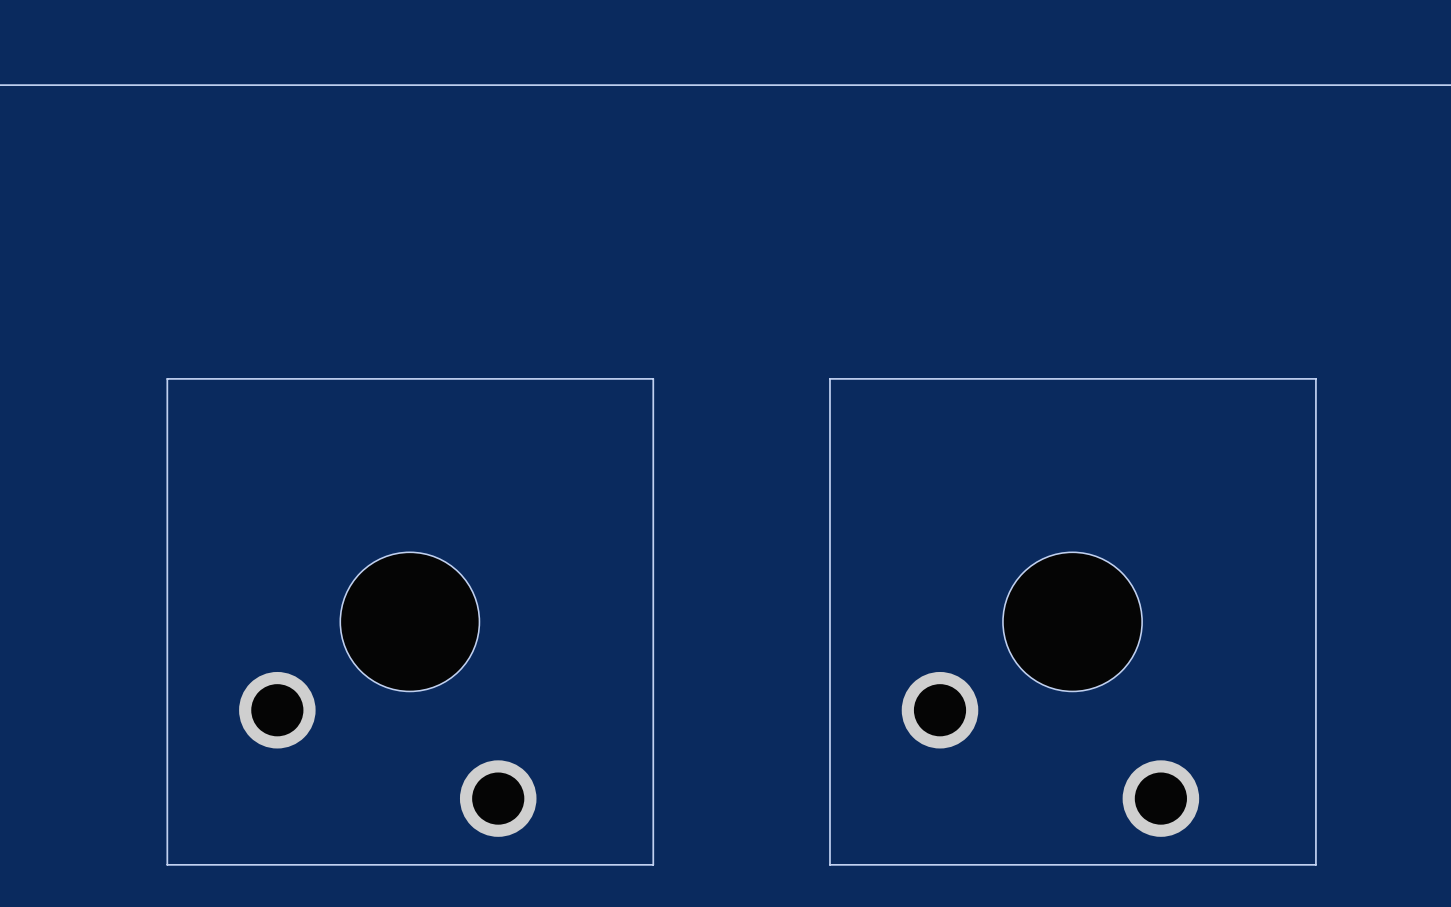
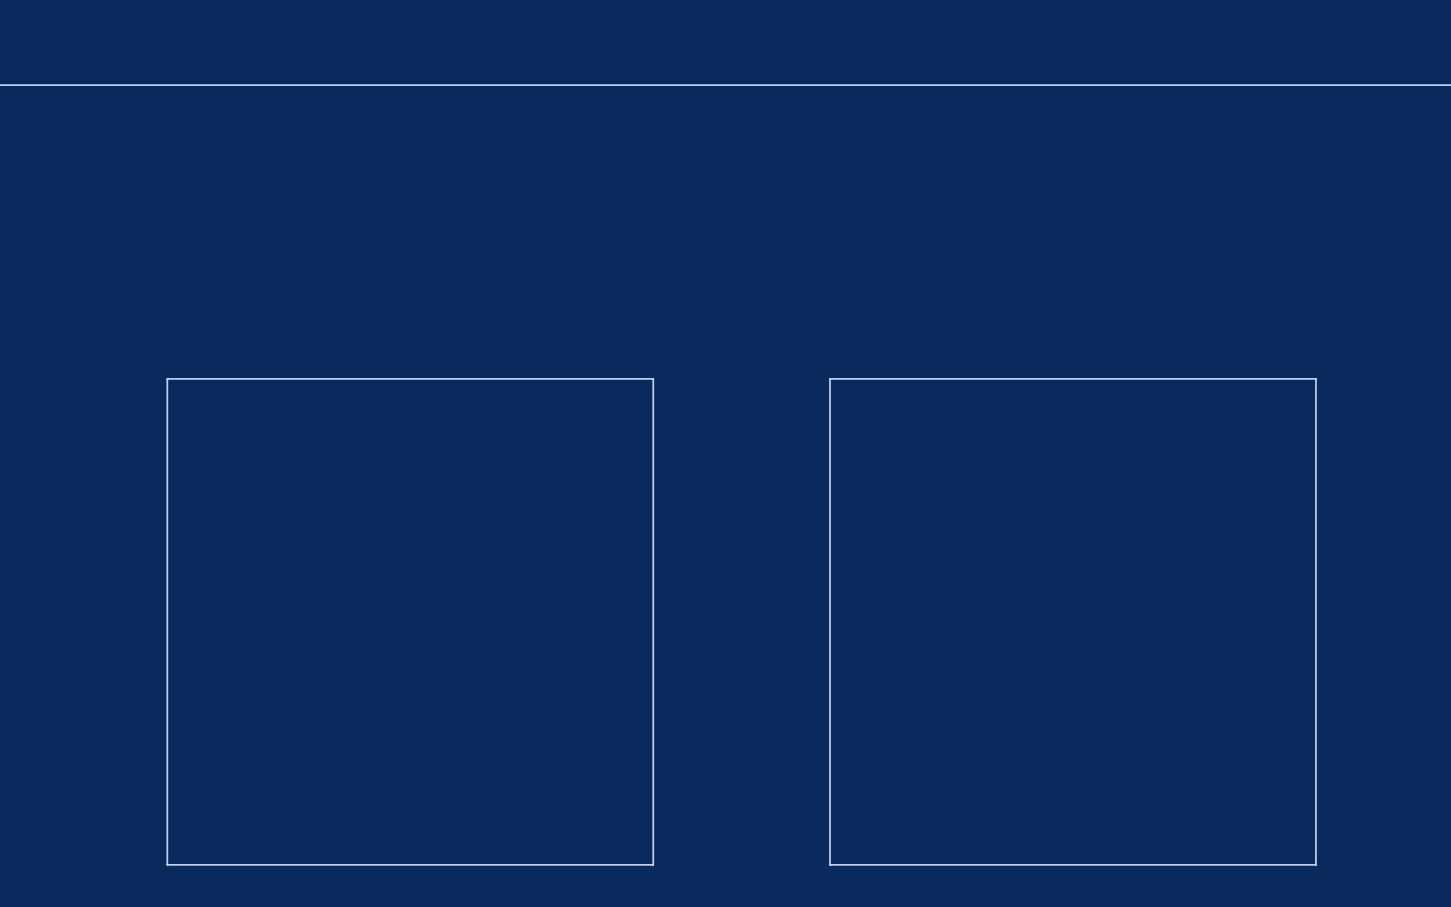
part: (387, 694) -> none
part: (1050, 694) -> none

